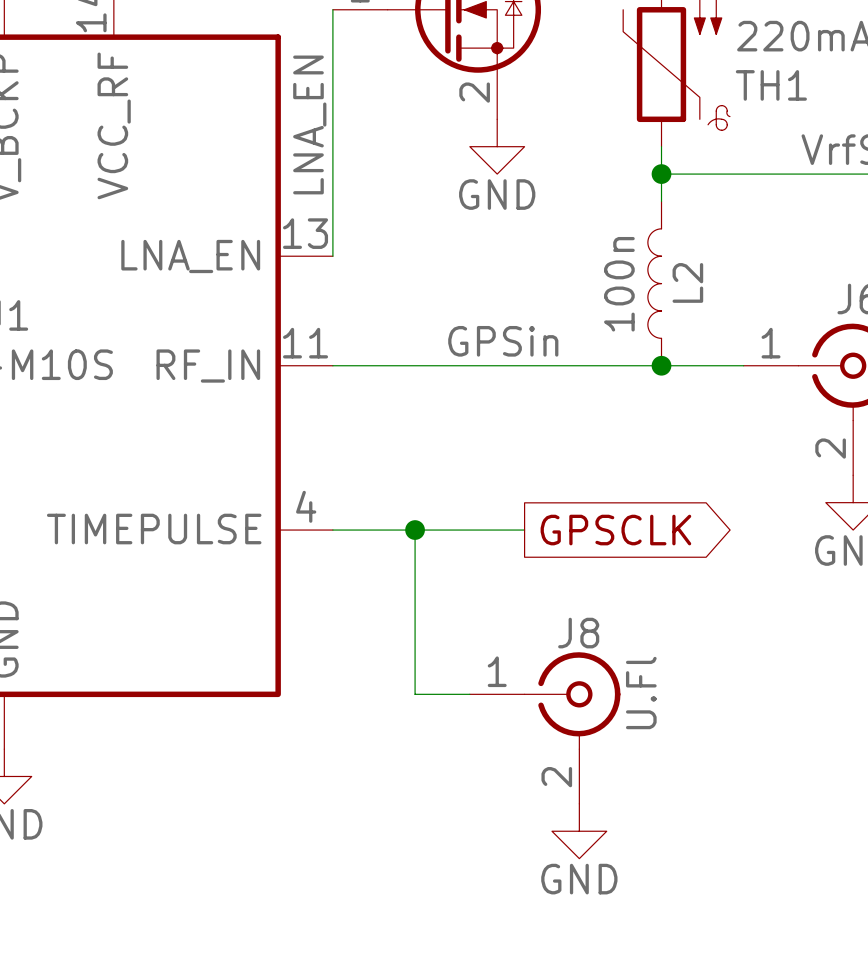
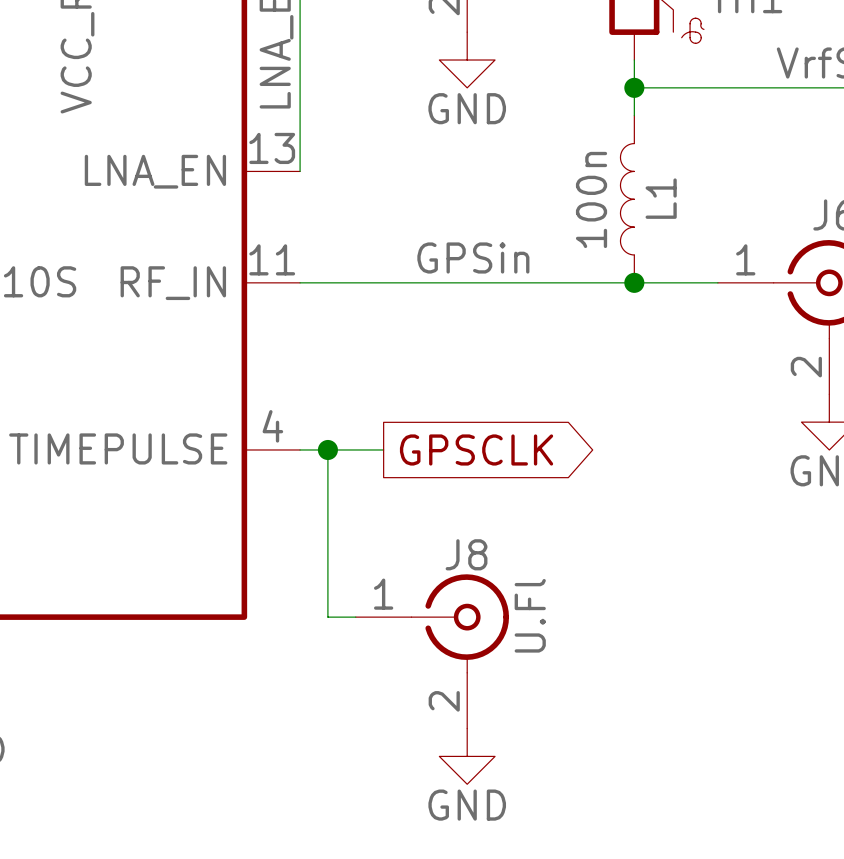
L2 name: L2 (687, 282) -> L1 (661, 198)
wire: none -> (327, 449) (327, 617) (355, 617)
junction position: (415, 530) -> (327, 449)
wire: (524, 530) (415, 530) (415, 694) (469, 694) -> none
global label position: GPSCLK (615, 530) -> GPSCLK (476, 449)
J8 position: (545, 728) -> (432, 651)
power symbol position: GND (579, 831) -> GND (467, 756)

